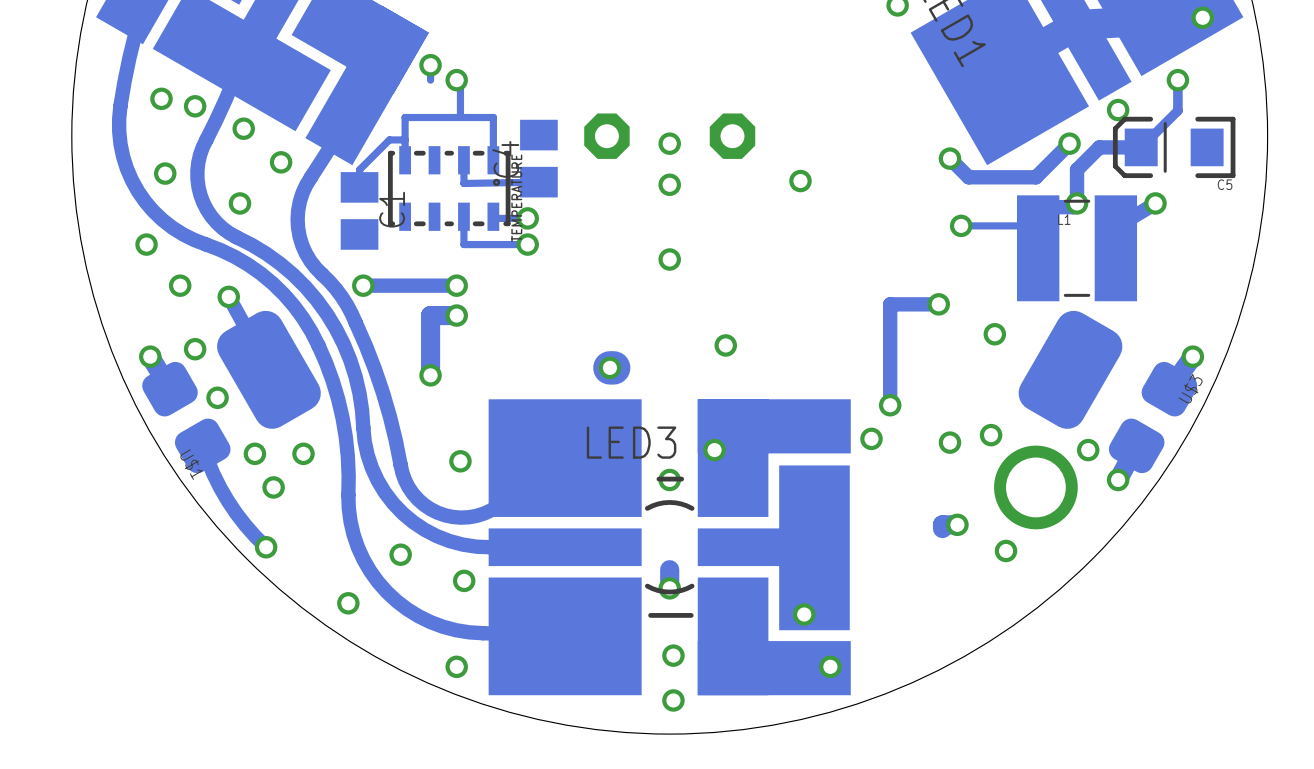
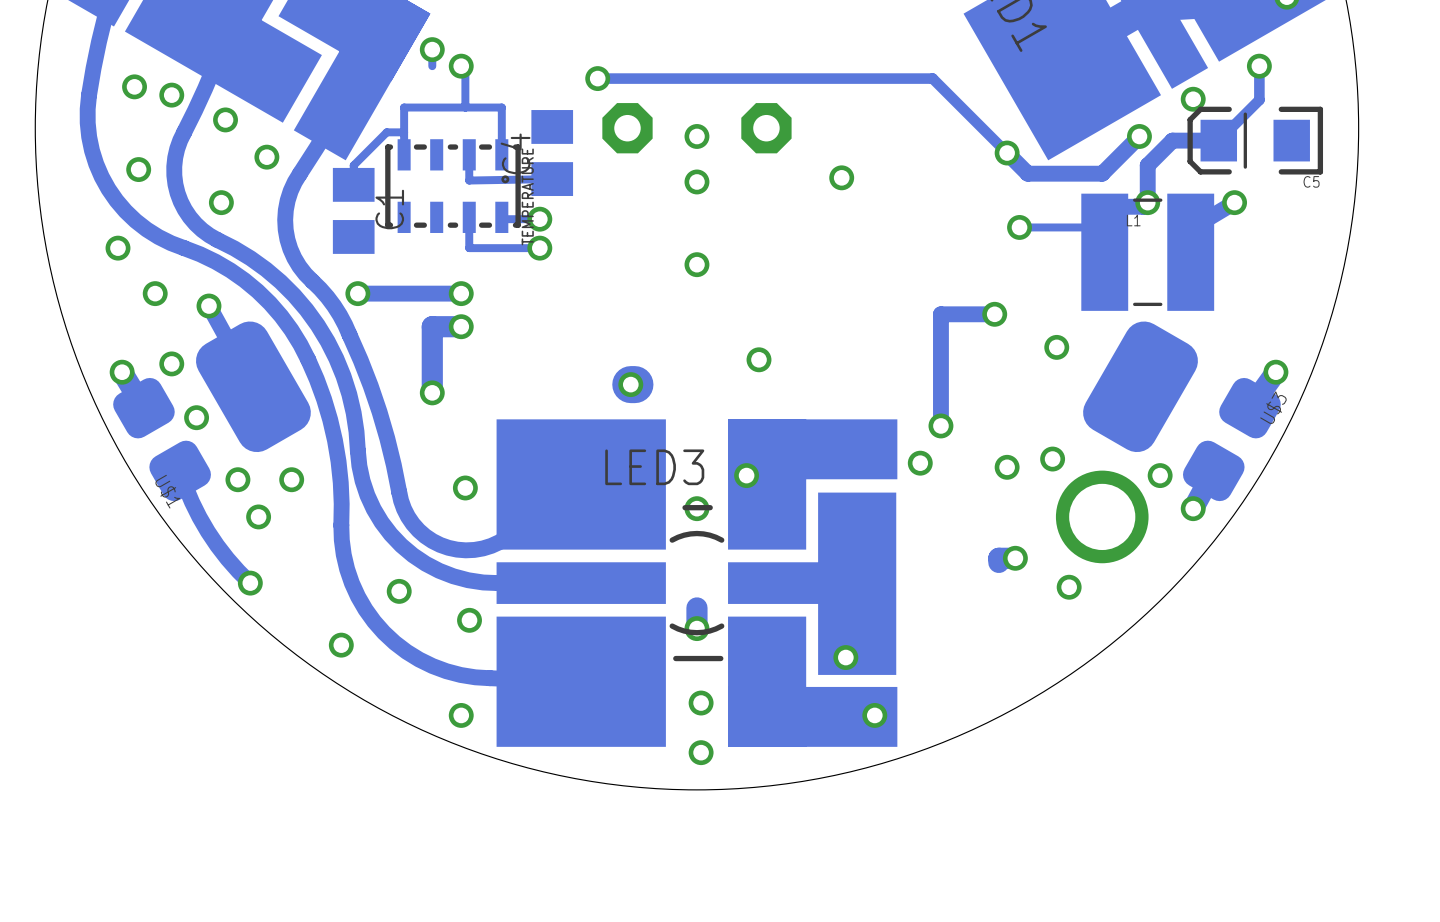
track: none -> (597, 78) (932, 78) (1007, 153)
via: none -> (597, 78)

